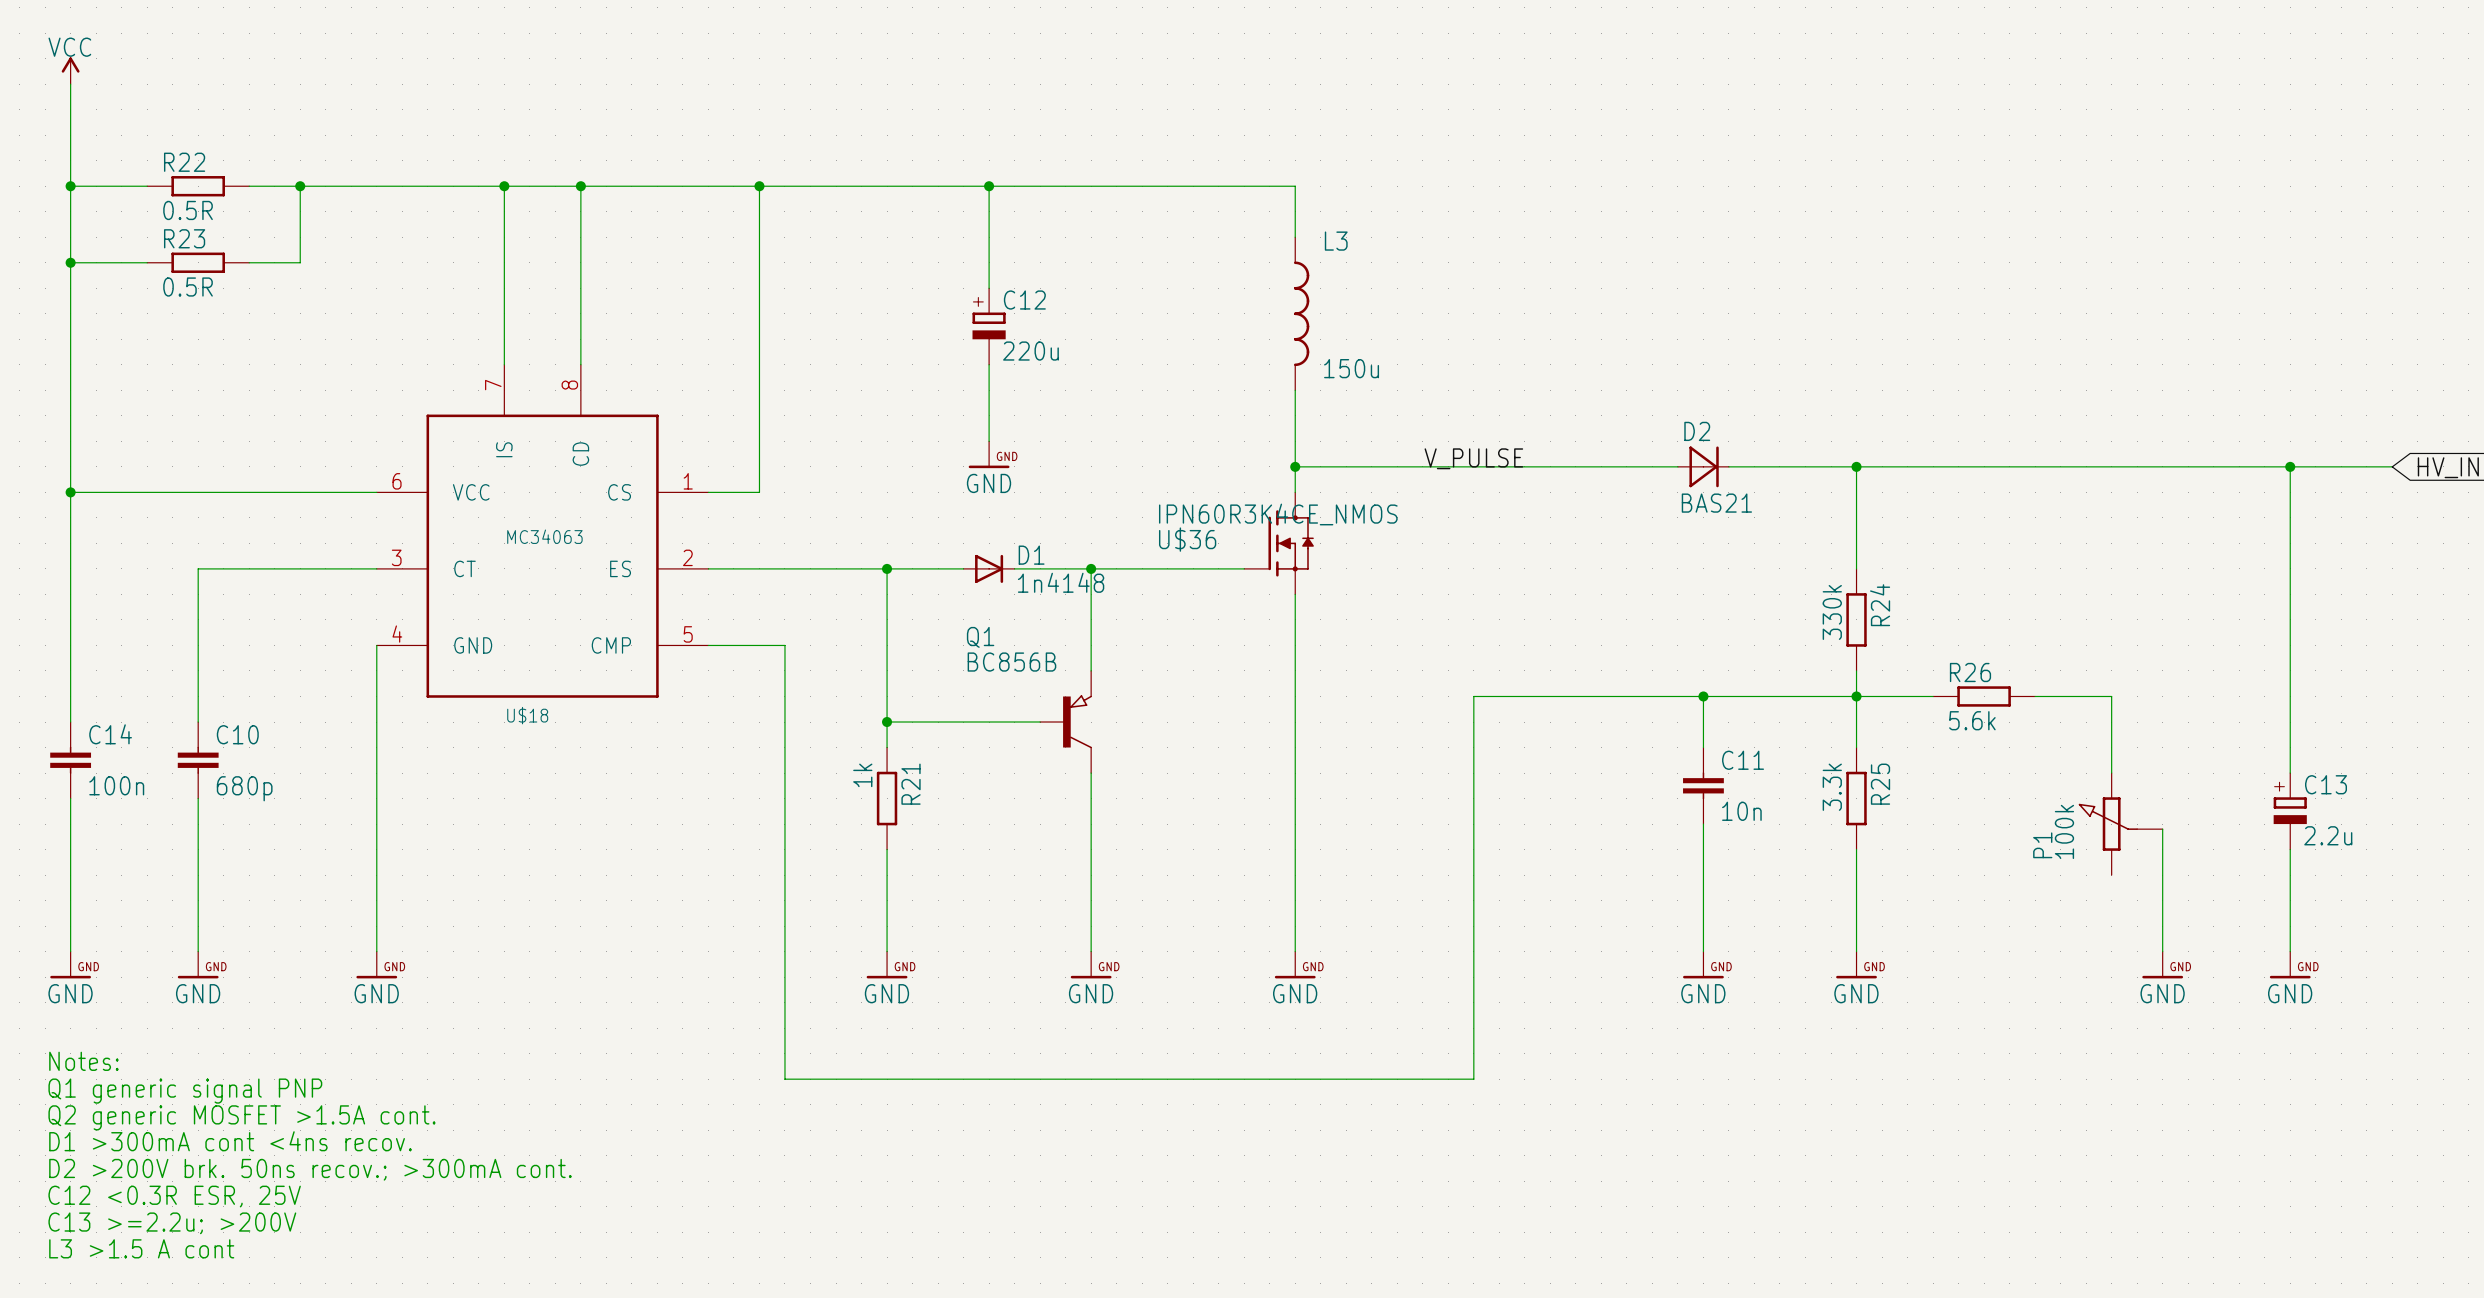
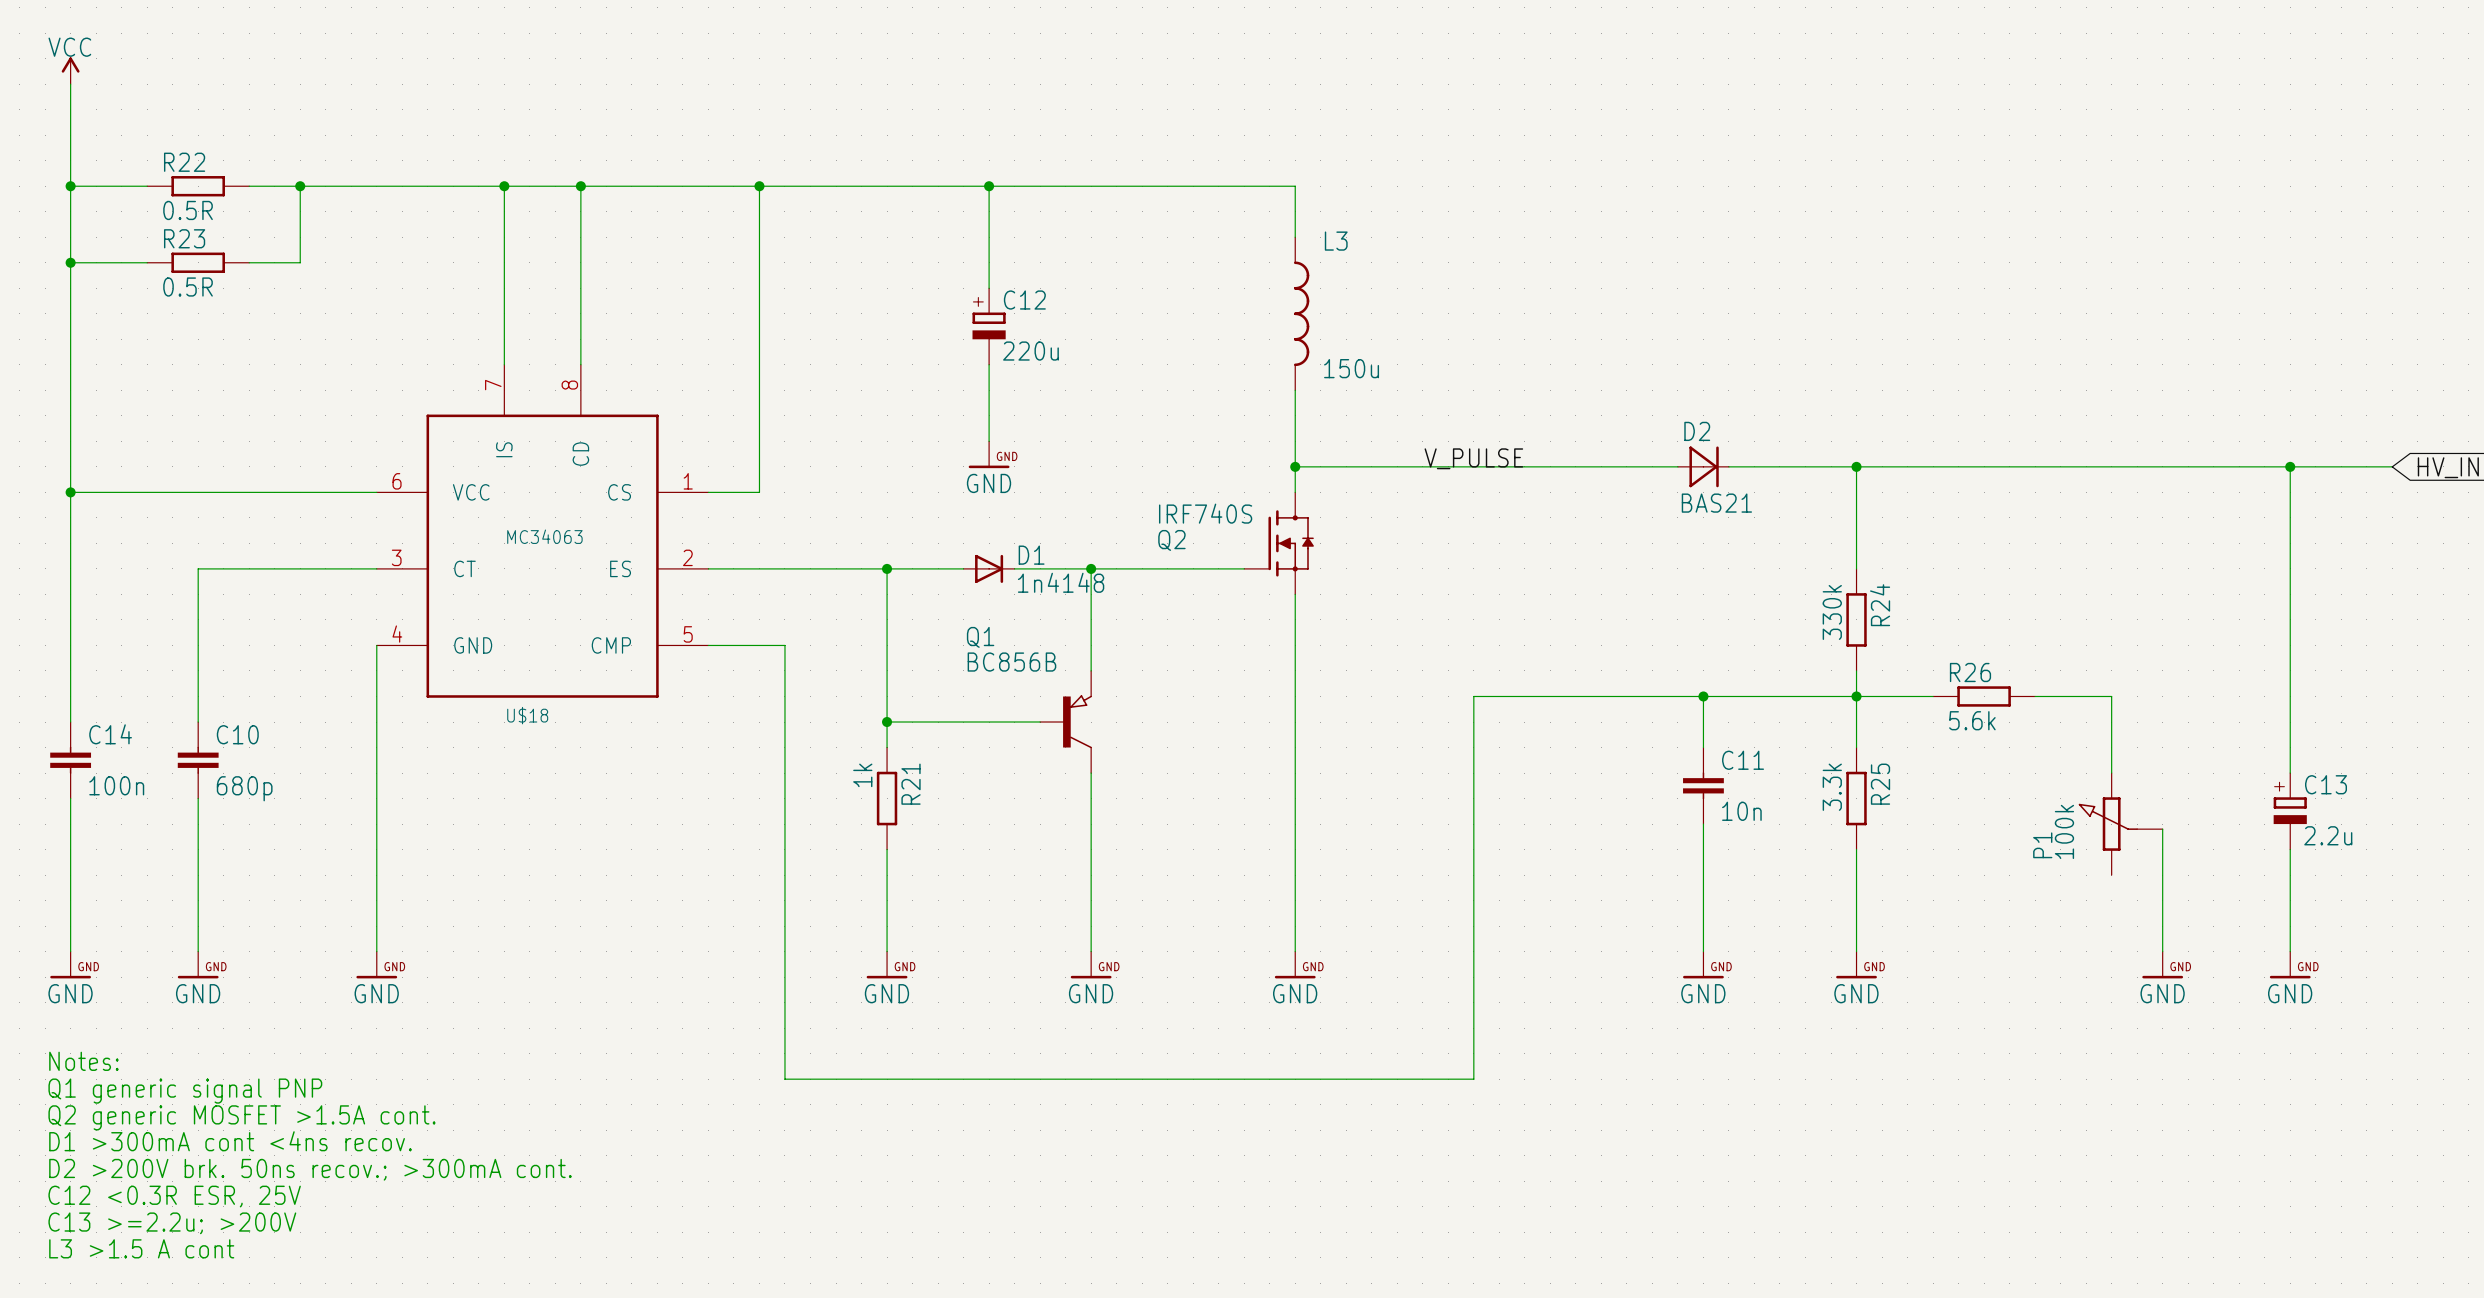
U$36 value: IPN60R3K4CE_NMOS (1278, 514) -> IRF740S (1205, 513)
U$36 name: U$36 (1187, 539) -> Q2 (1171, 540)

